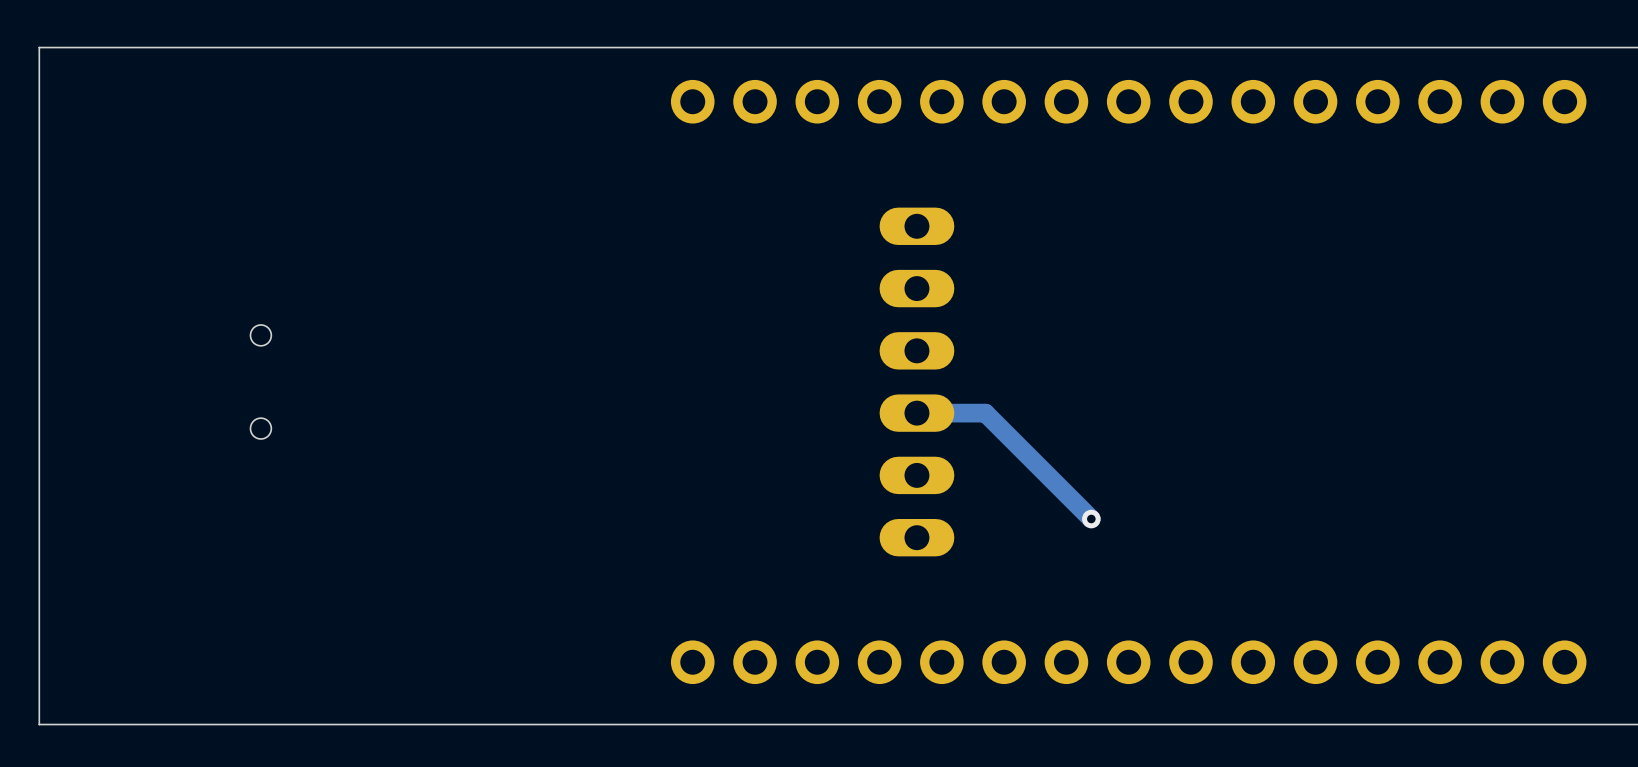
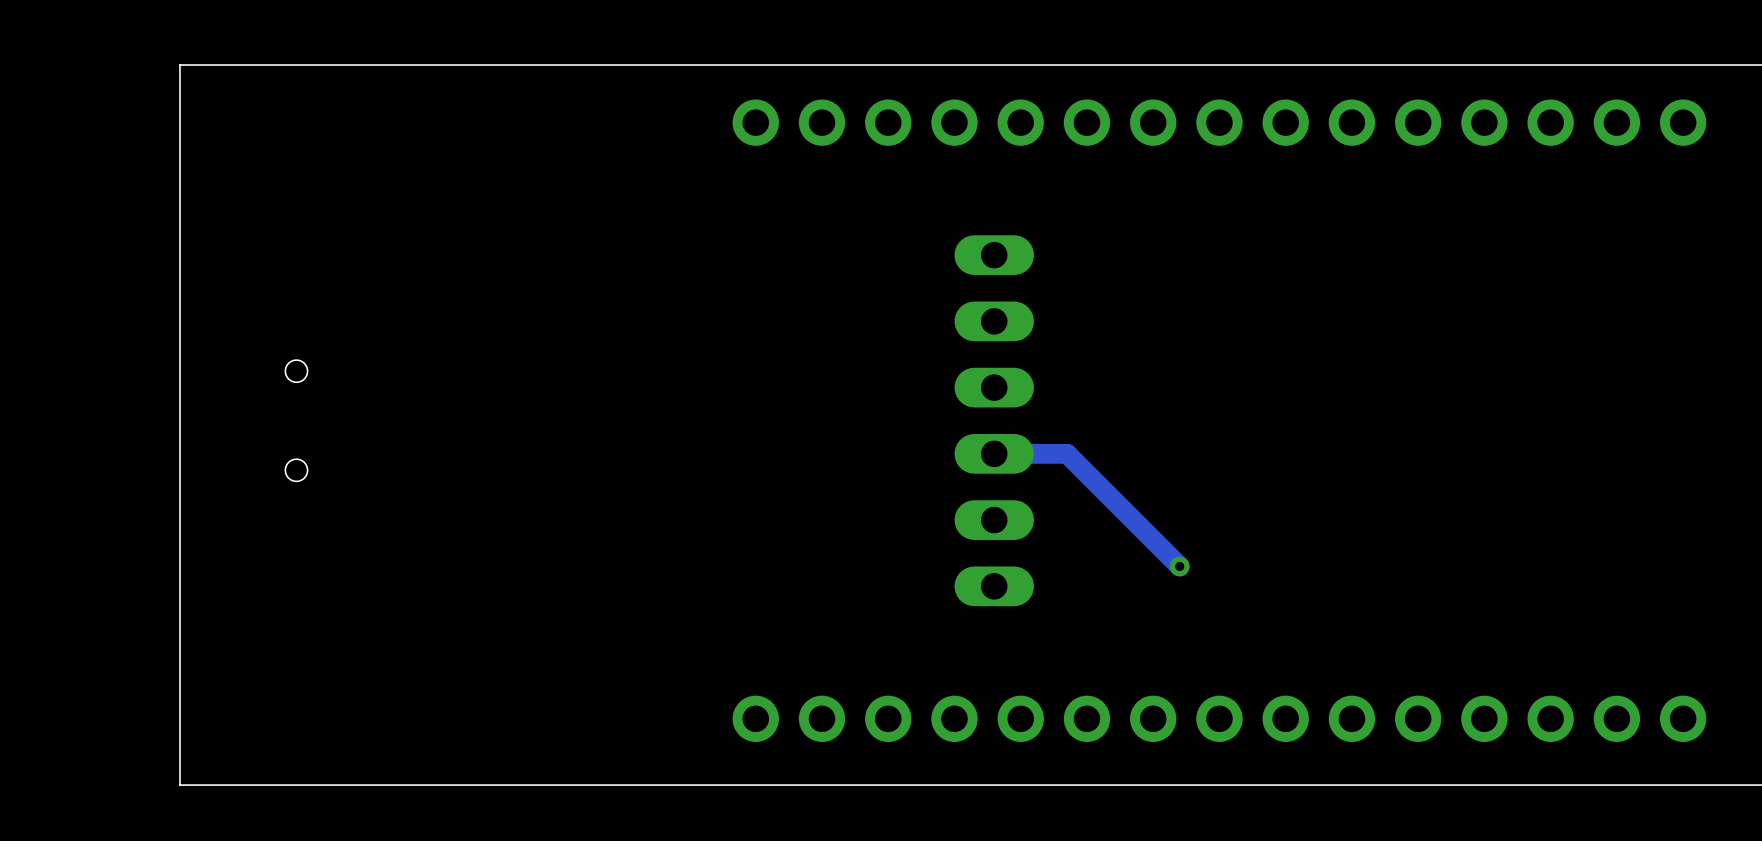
board edge: (151, 47) (39, 47) (39, 724) (151, 724) -> (180, 65) (180, 785)

